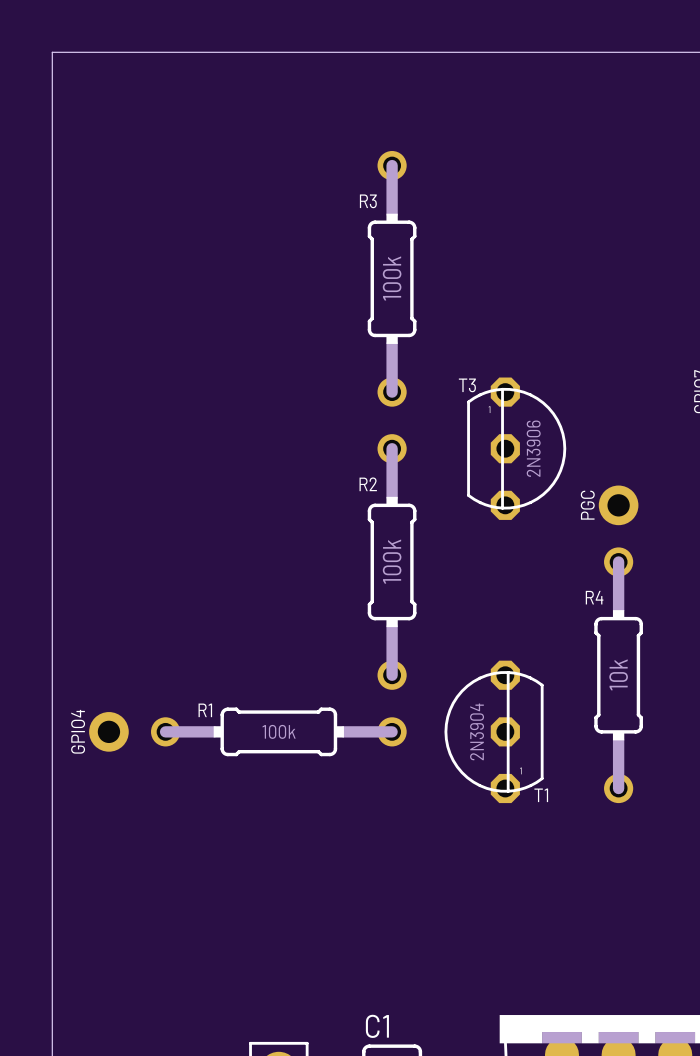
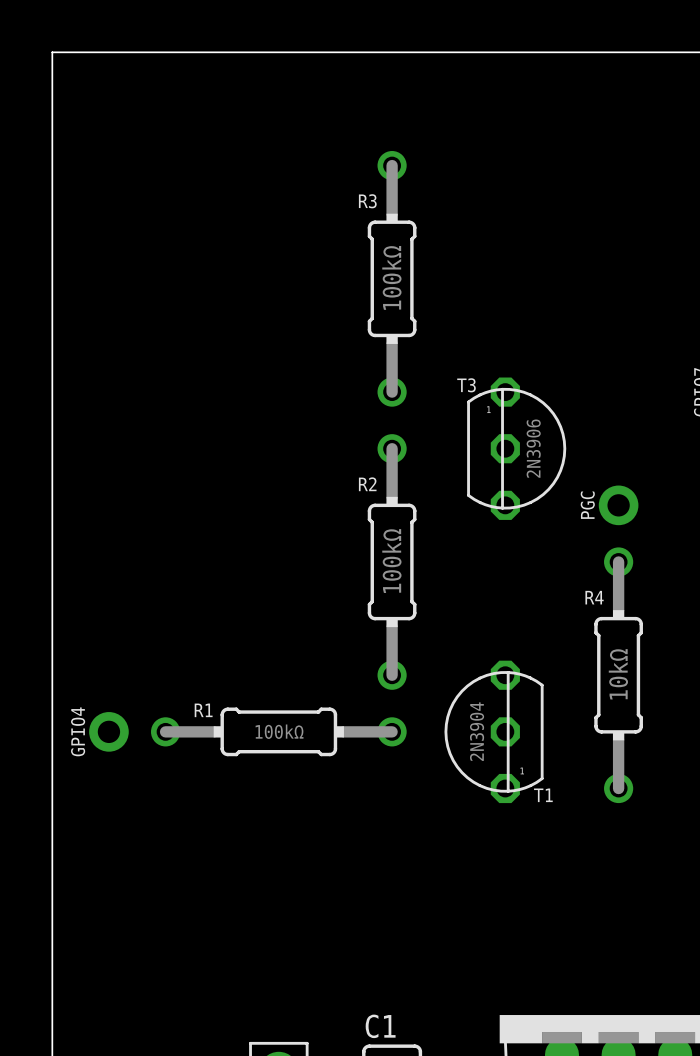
R3 value: 100k (392, 278) -> 100kΩ (391, 277)
R2 value: 100k (392, 561) -> 100kΩ (391, 561)
R4 value: 10k (618, 674) -> 10kΩ (618, 674)
R1 value: 100k (279, 731) -> 100kΩ (279, 731)

